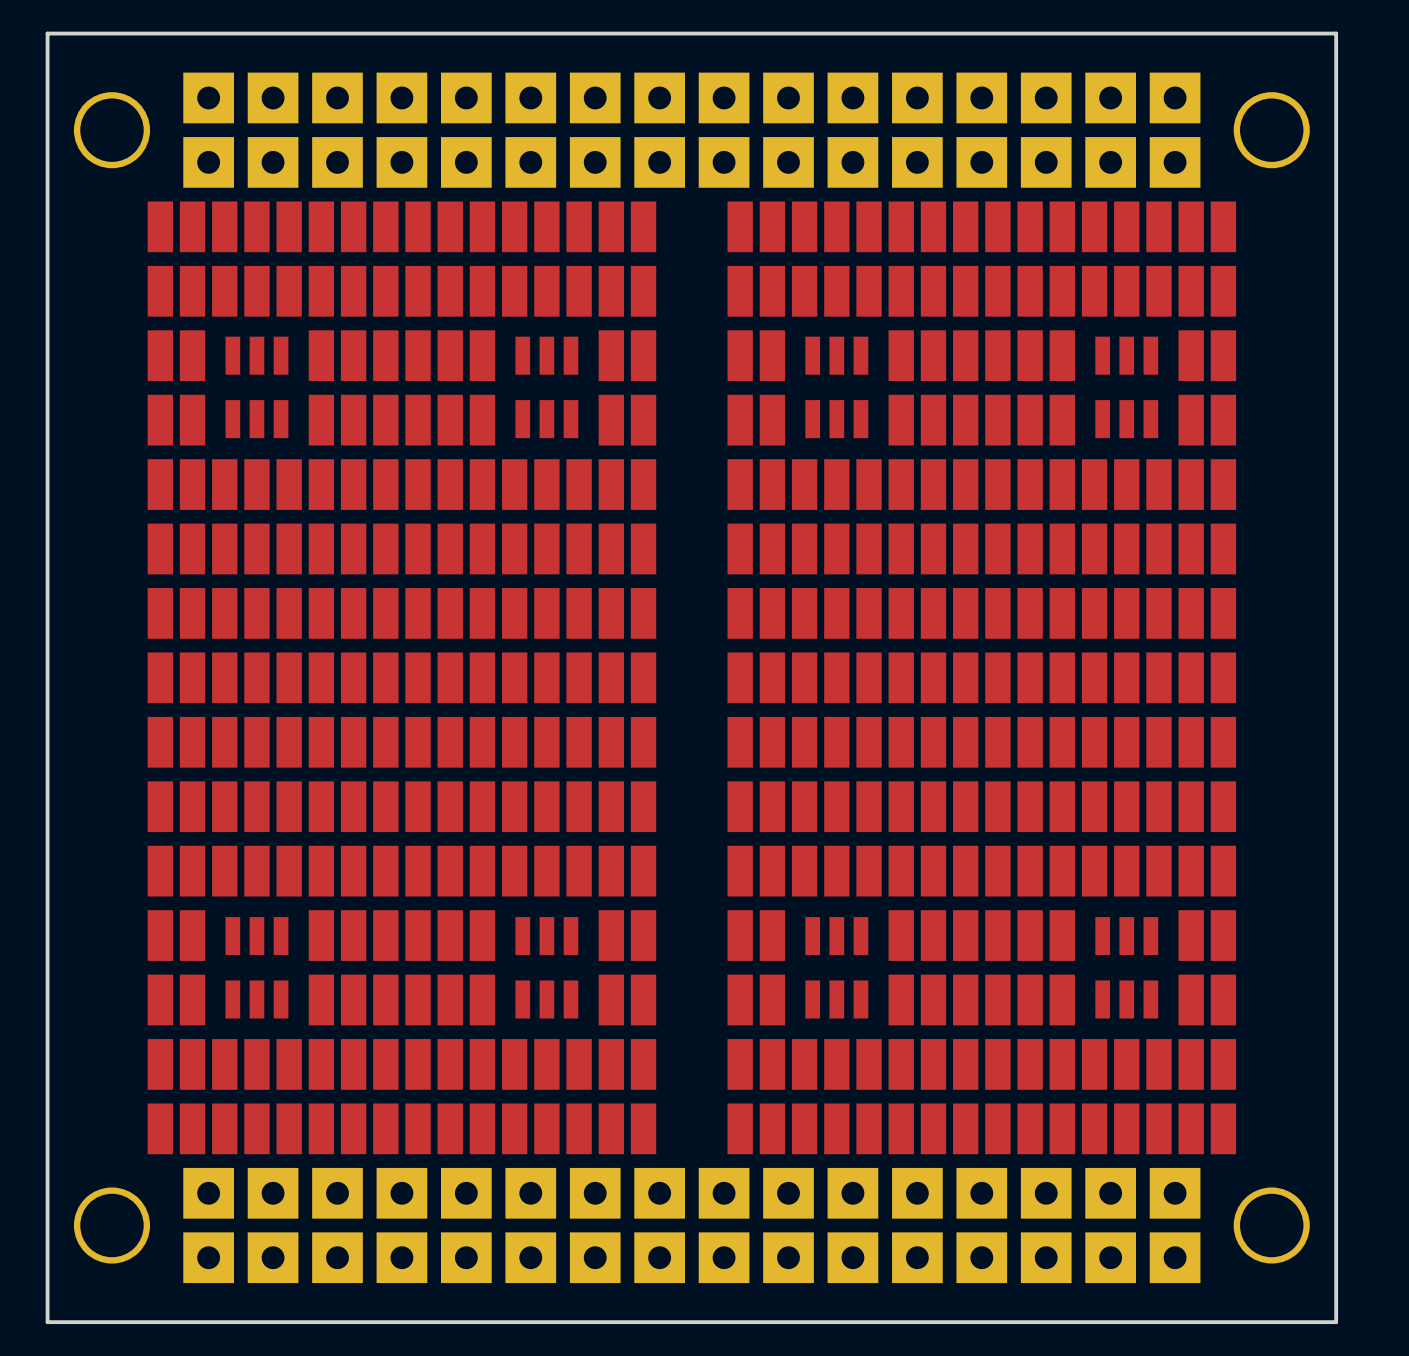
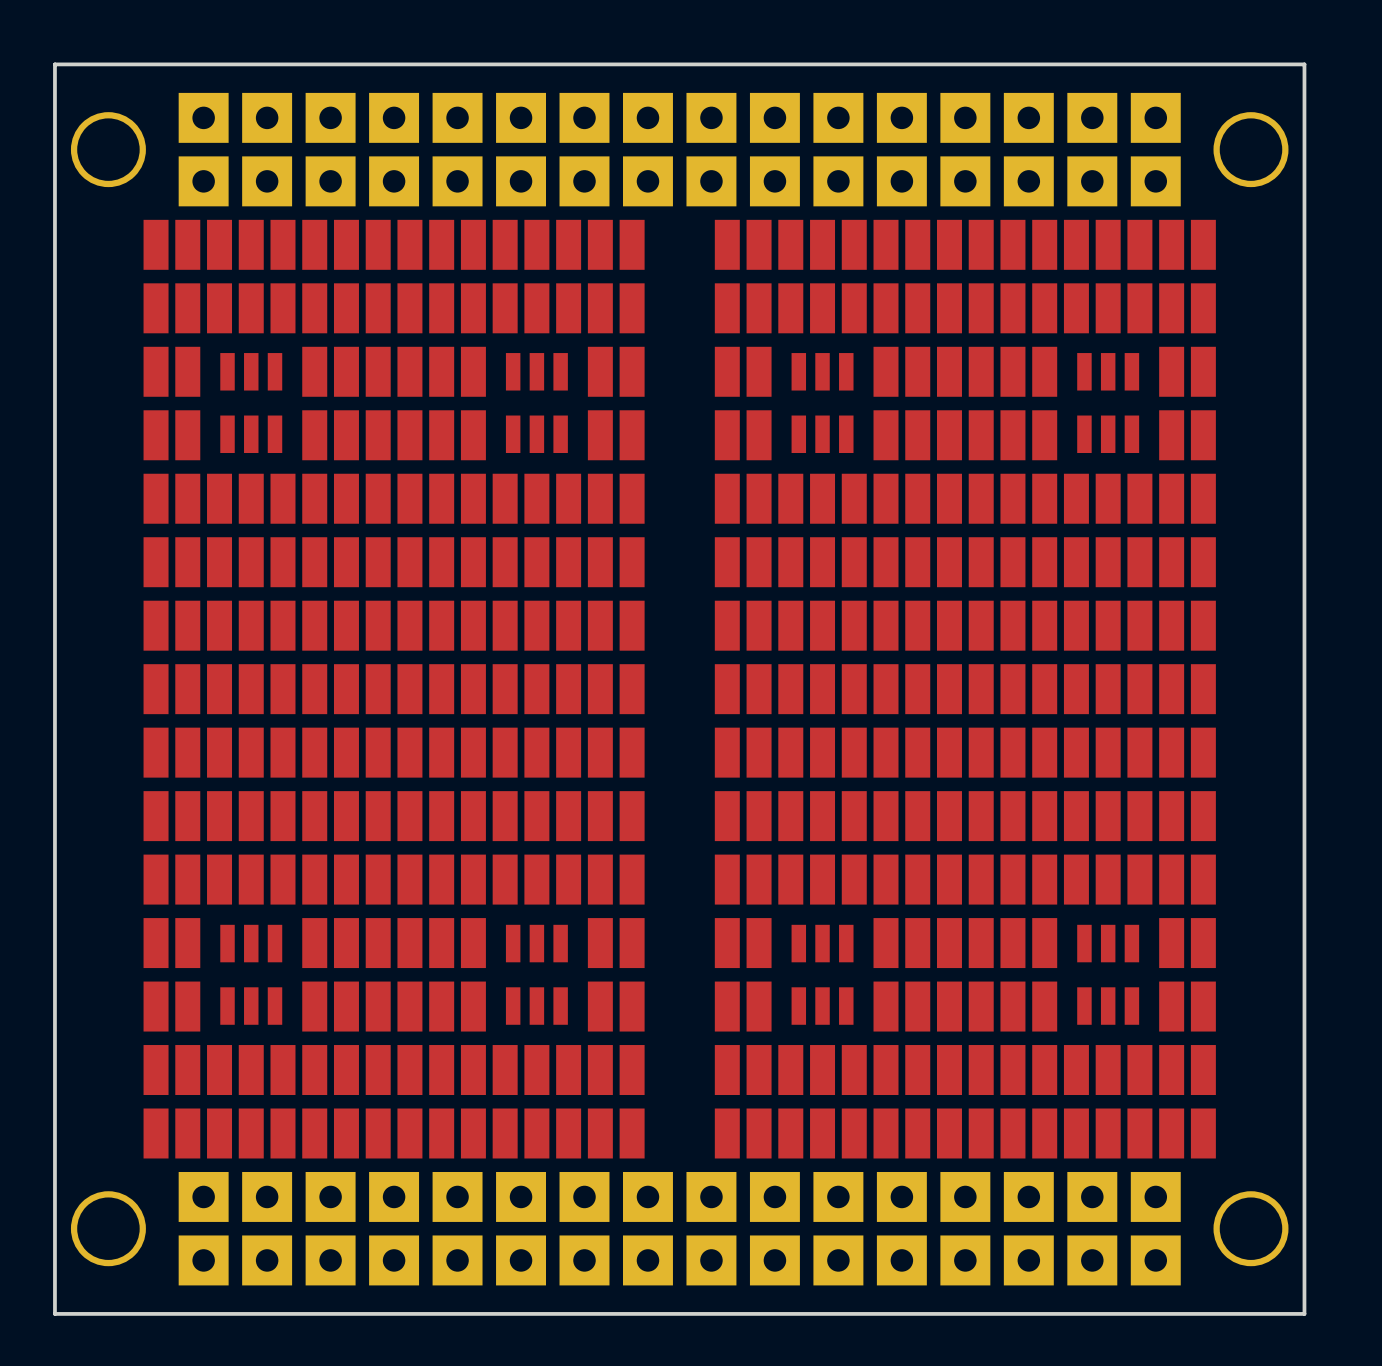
board edge: (47, 33) (47, 1322) (1336, 1322) (1336, 33) (47, 33) -> (54, 64) (54, 1313) (1304, 1313) (1304, 64) (54, 64)

